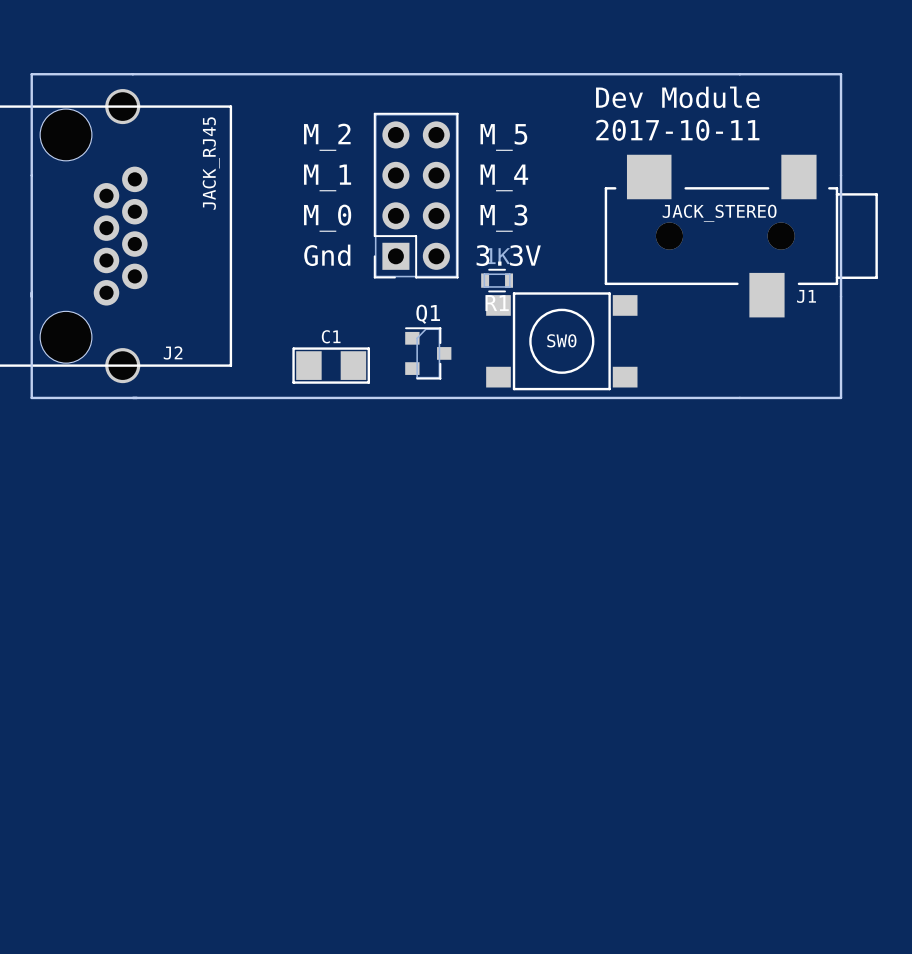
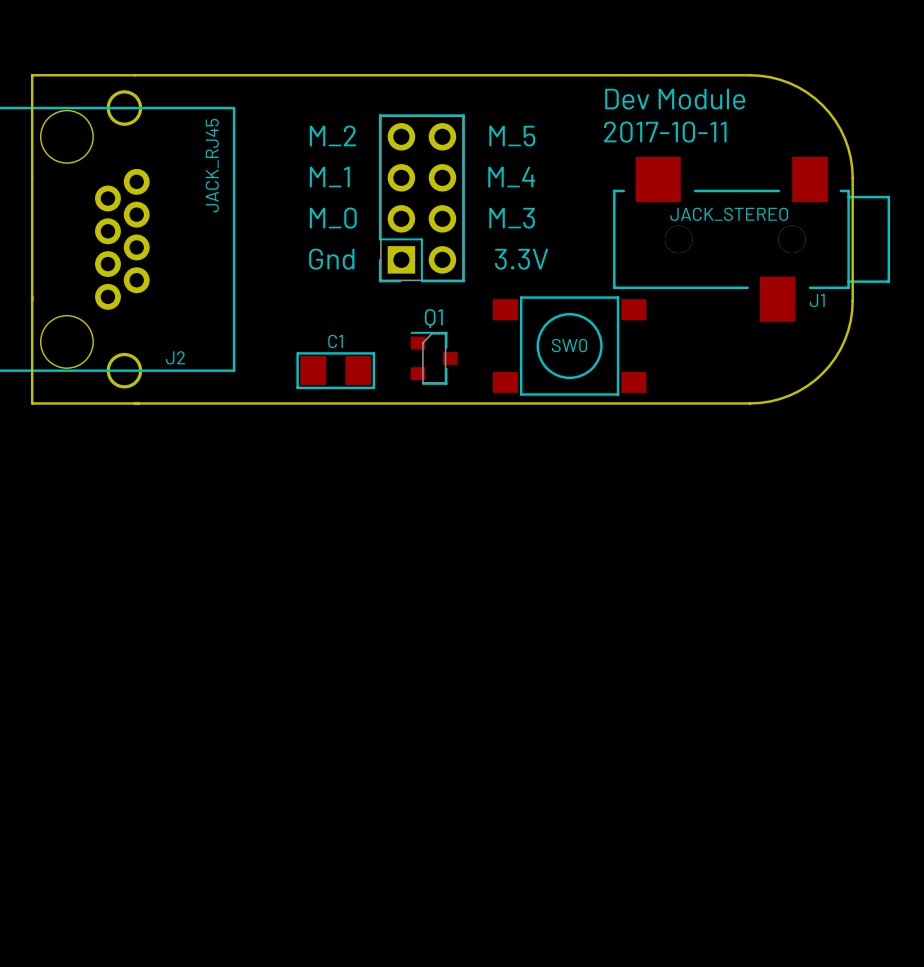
board edge: (739, 74) (841, 74) (841, 175) -> (750, 75) (770, 77) (789, 83) (807, 92) (822, 105) (835, 120) (844, 138) (850, 157) (852, 177)
part: 1K (497, 280) -> none
board edge: (841, 296) (841, 397) (739, 397) -> (852, 300) (850, 320) (844, 340) (835, 357) (822, 373) (807, 386) (789, 395) (770, 401) (750, 403)

